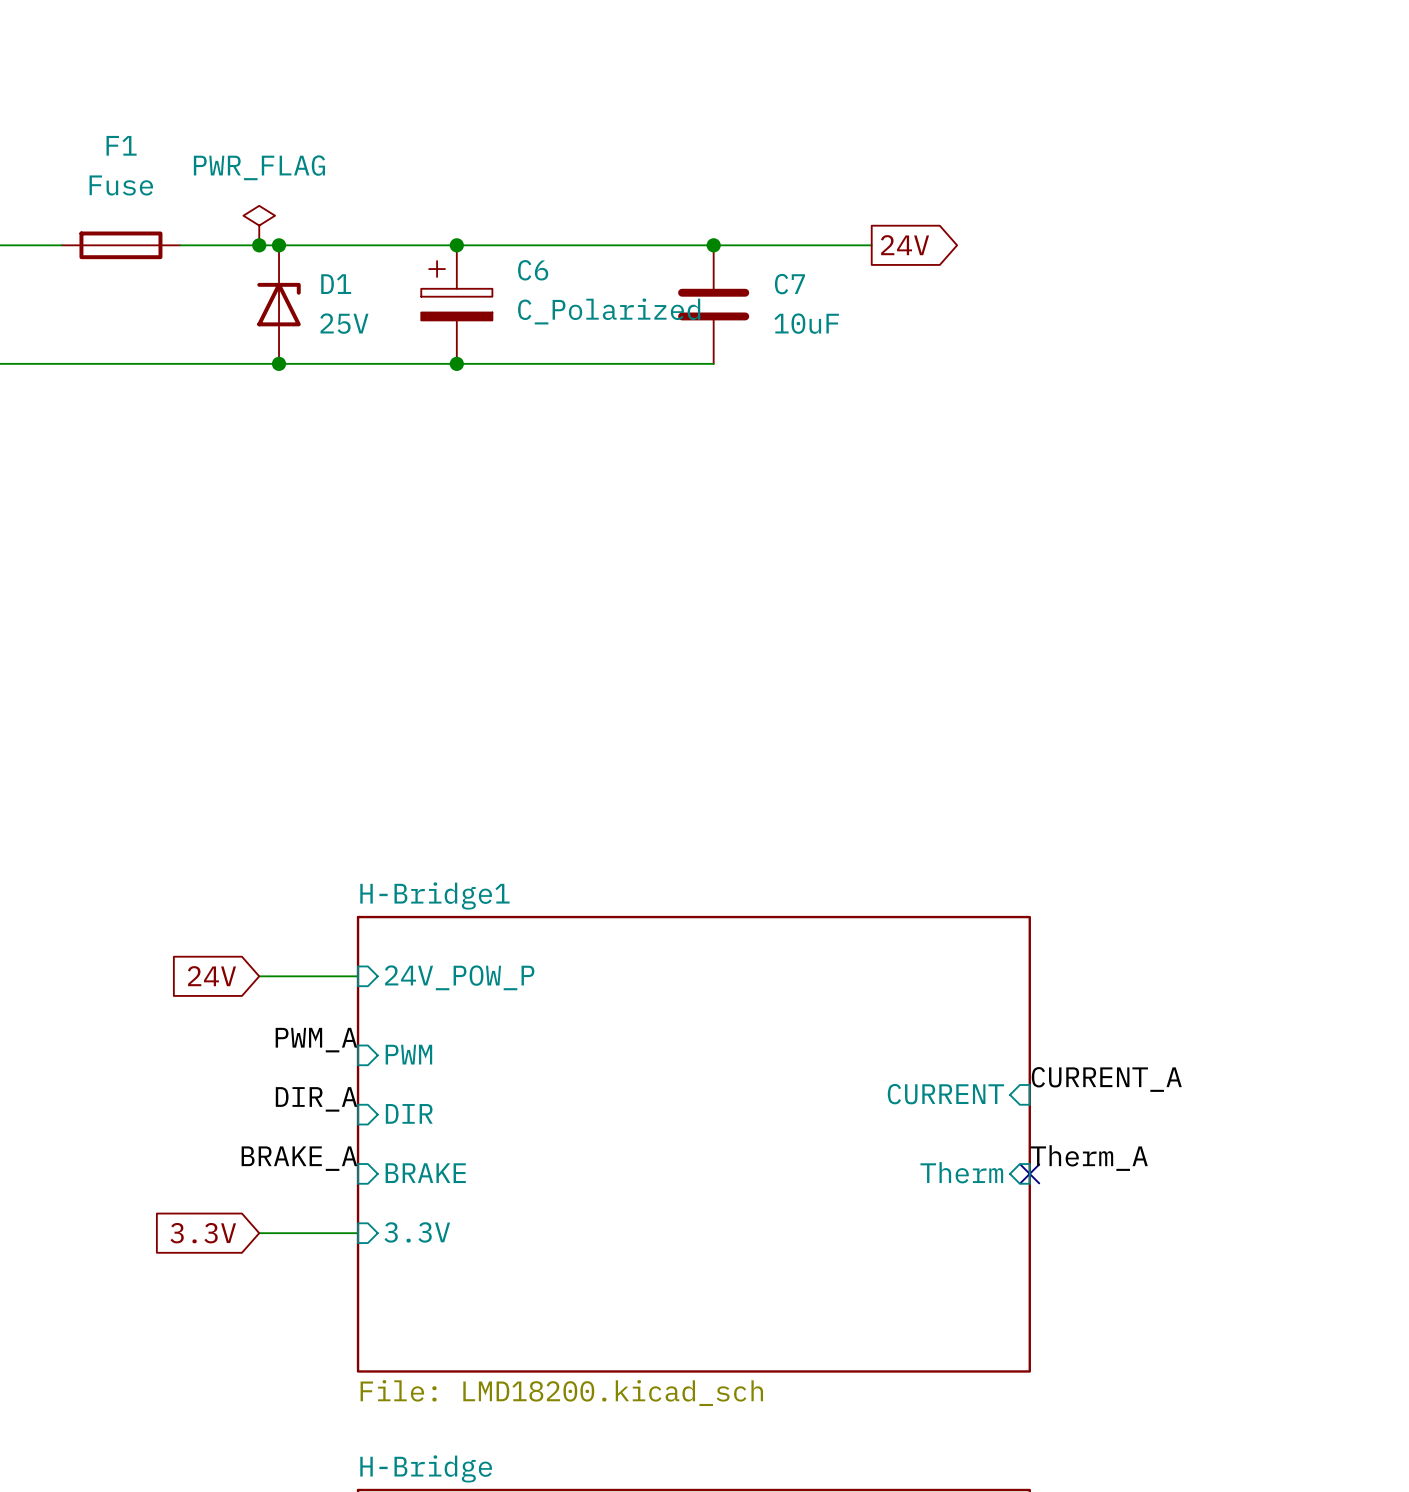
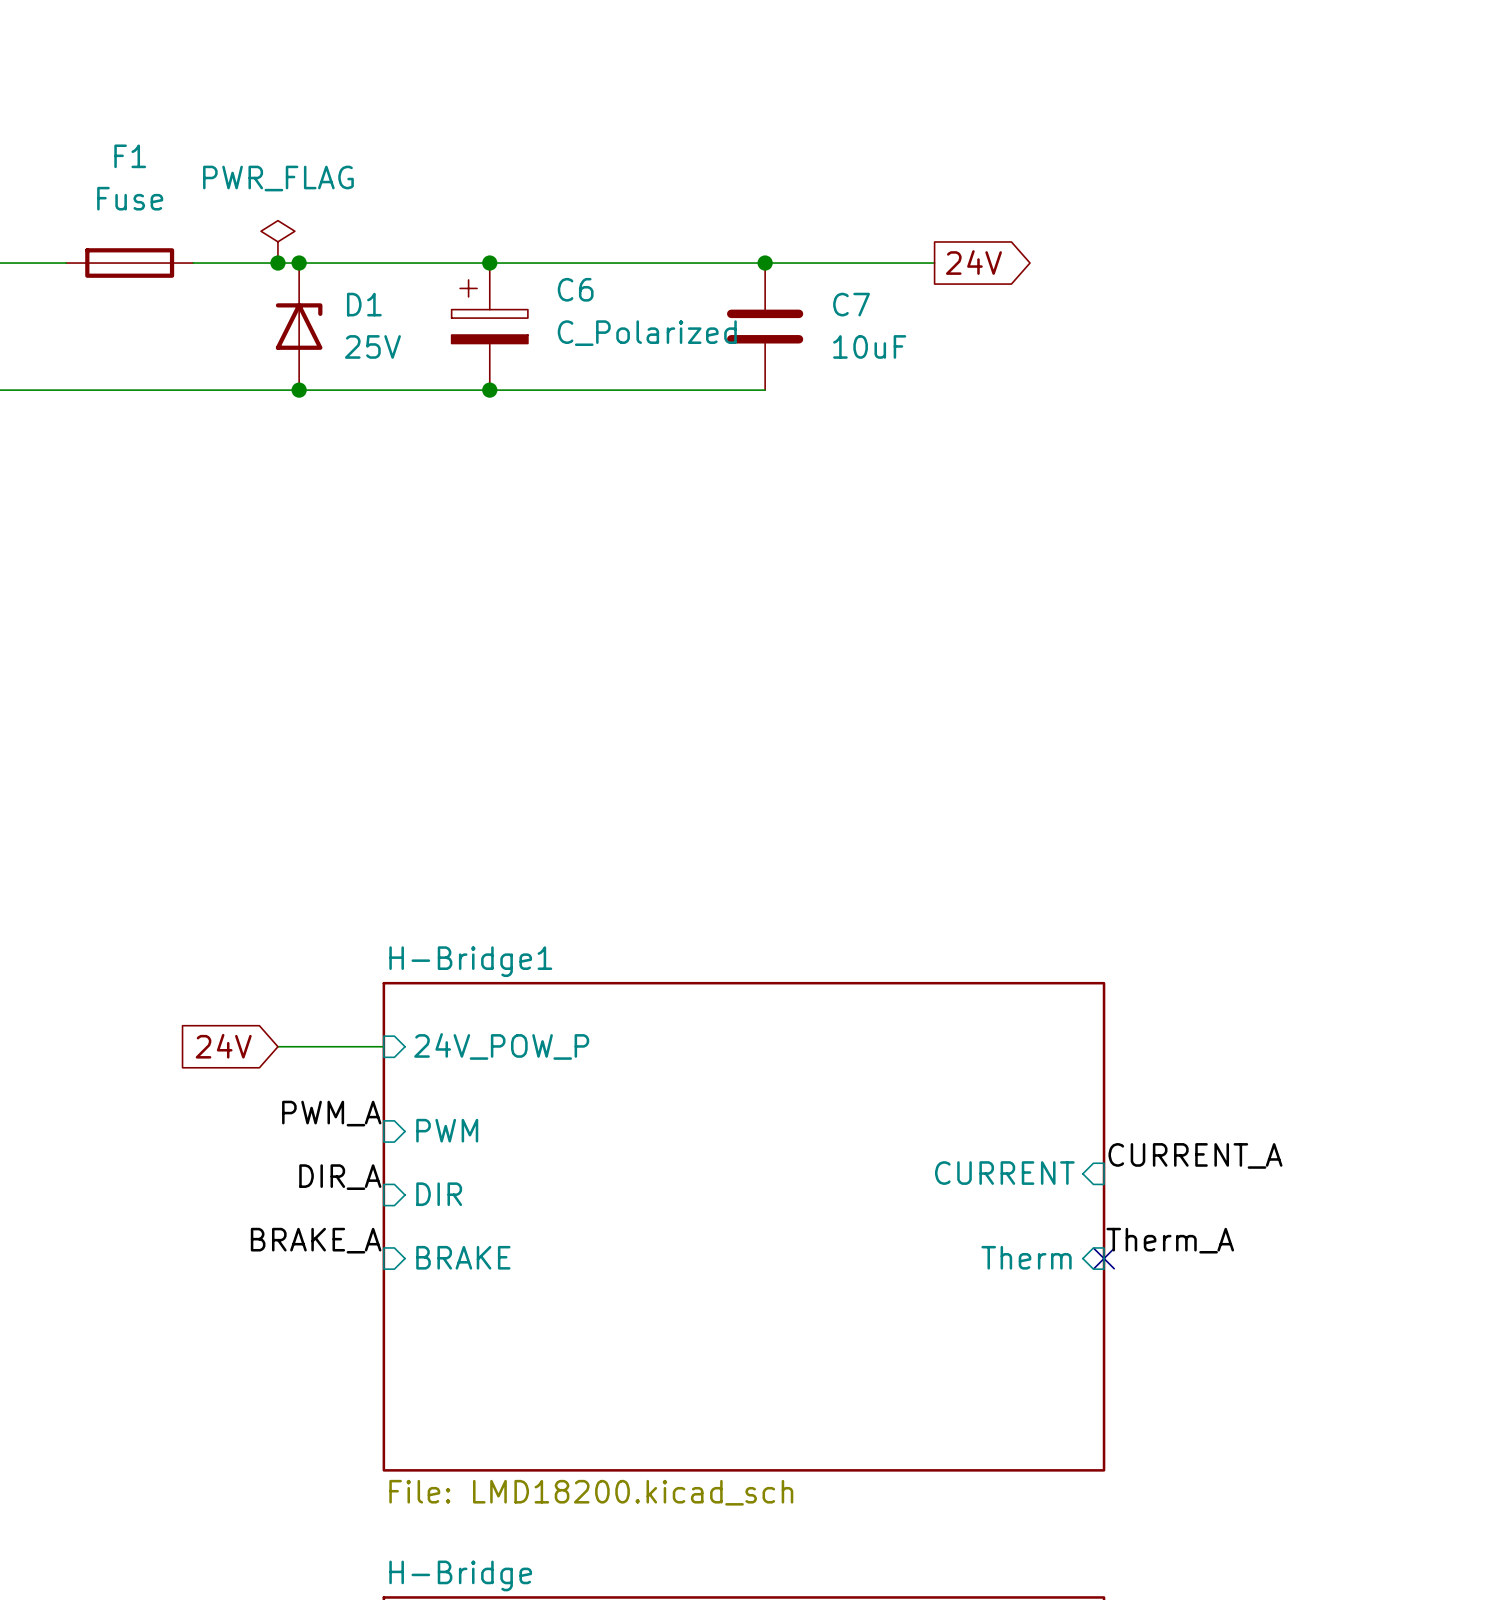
sheet pin: 3.3V (417, 1232) -> none
global label: 3.3V (203, 1233) -> none
wire: (259, 1233) (358, 1233) -> none

